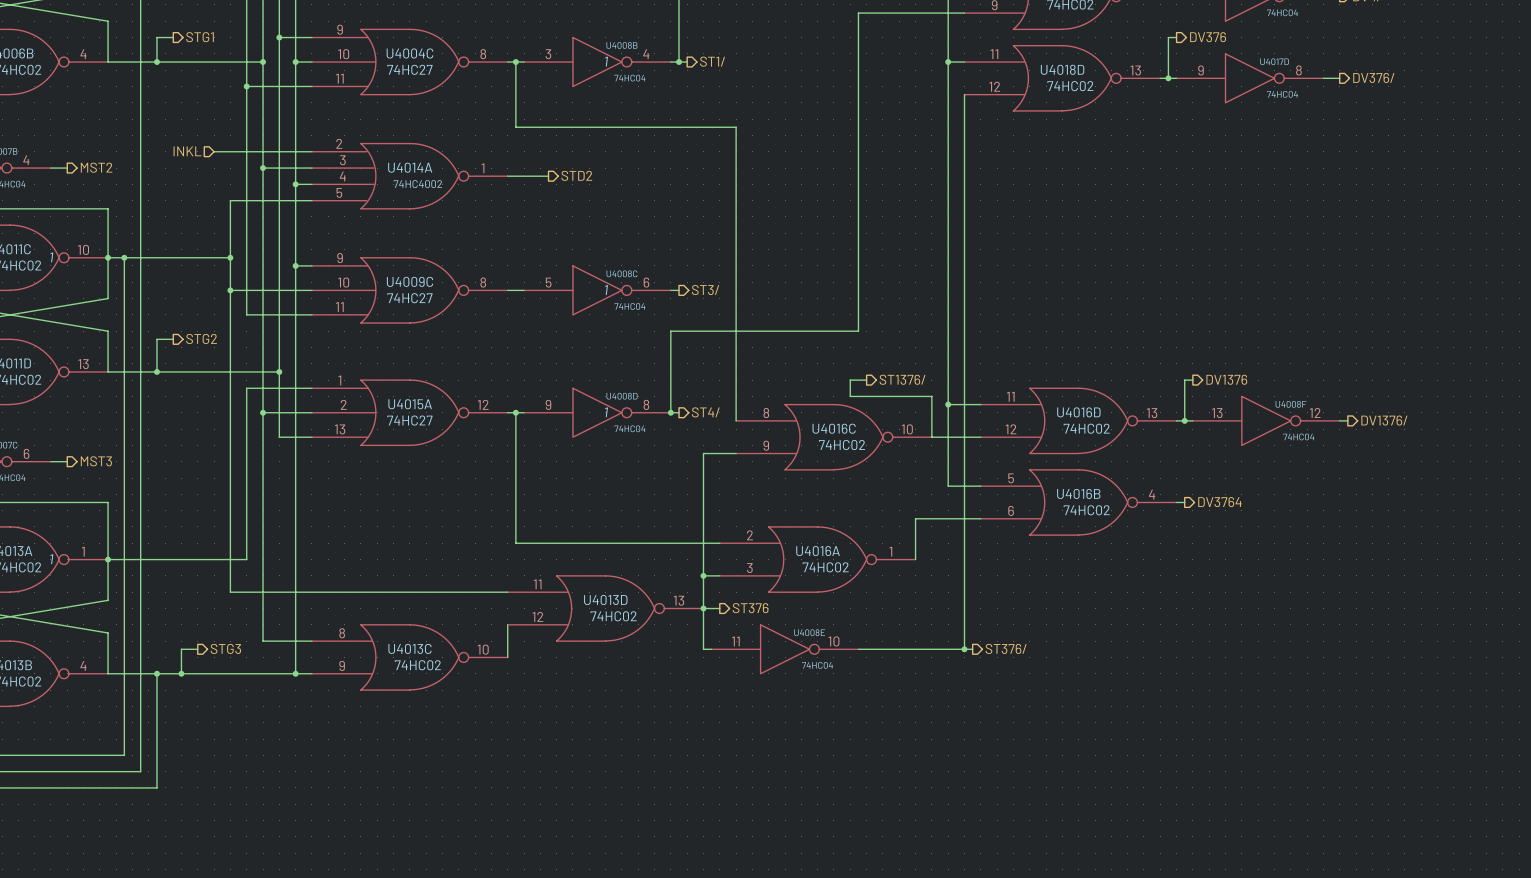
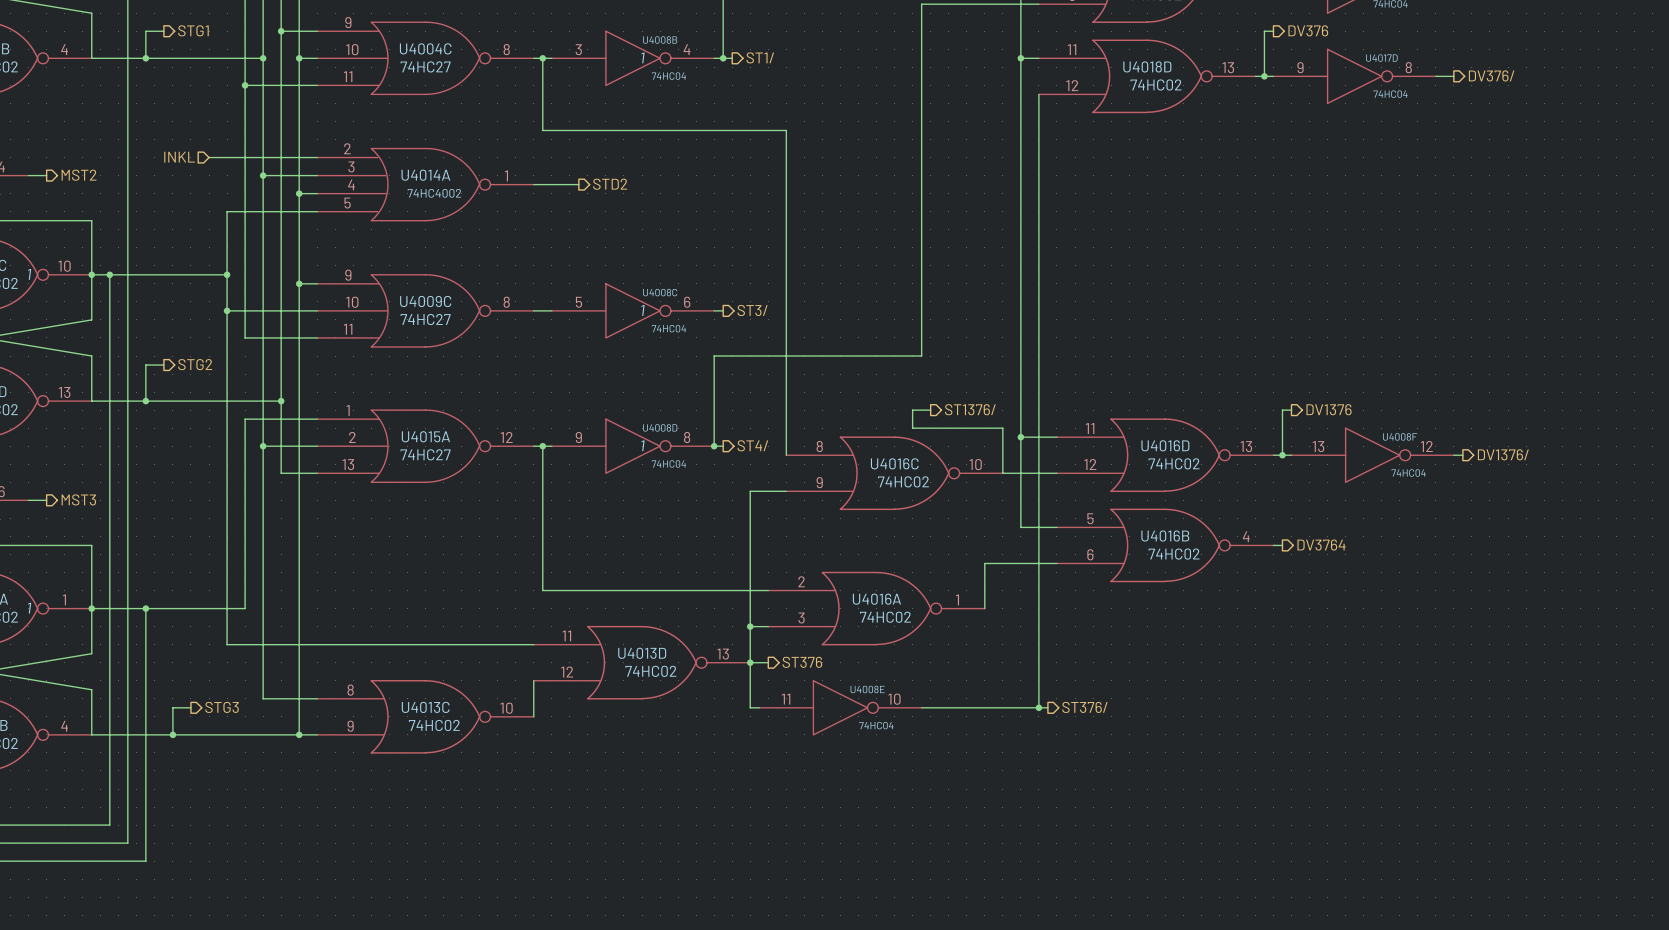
wire: none -> (145, 608) (145, 734)
junction: none -> (145, 608)
junction: (156, 673) -> none

